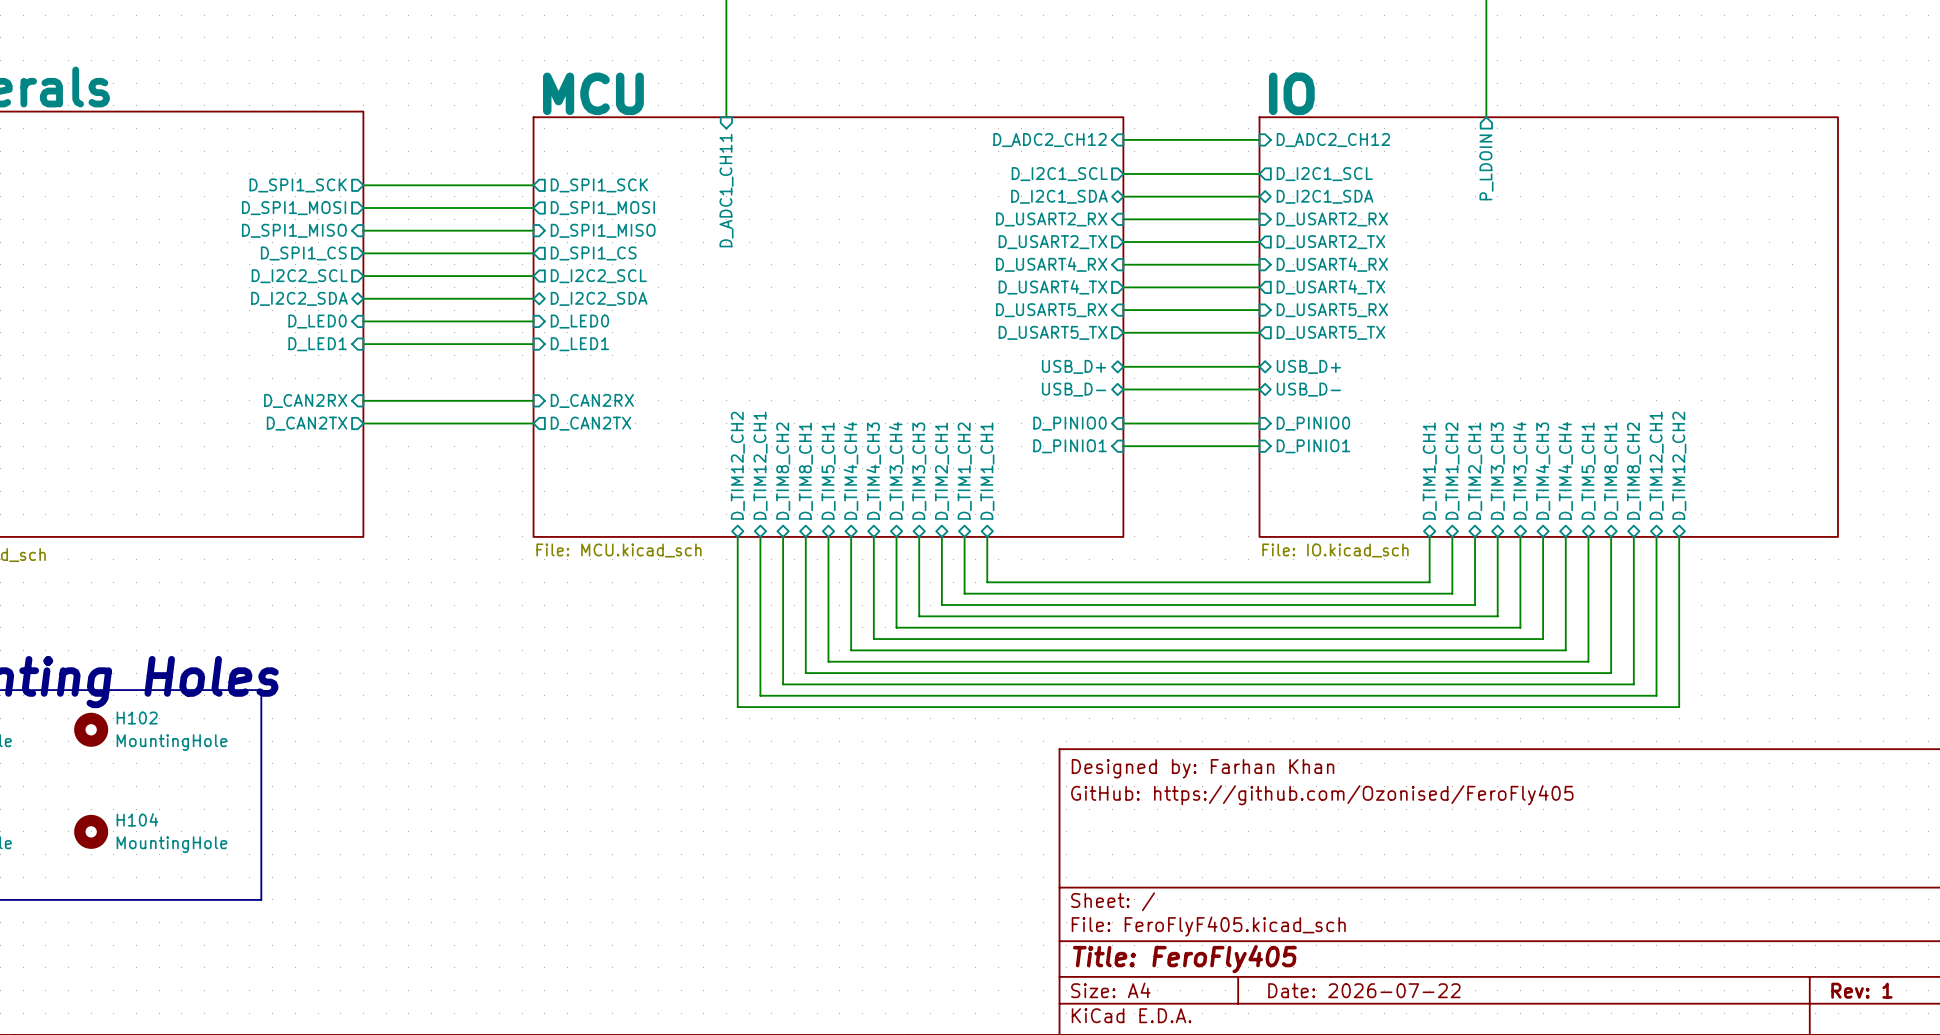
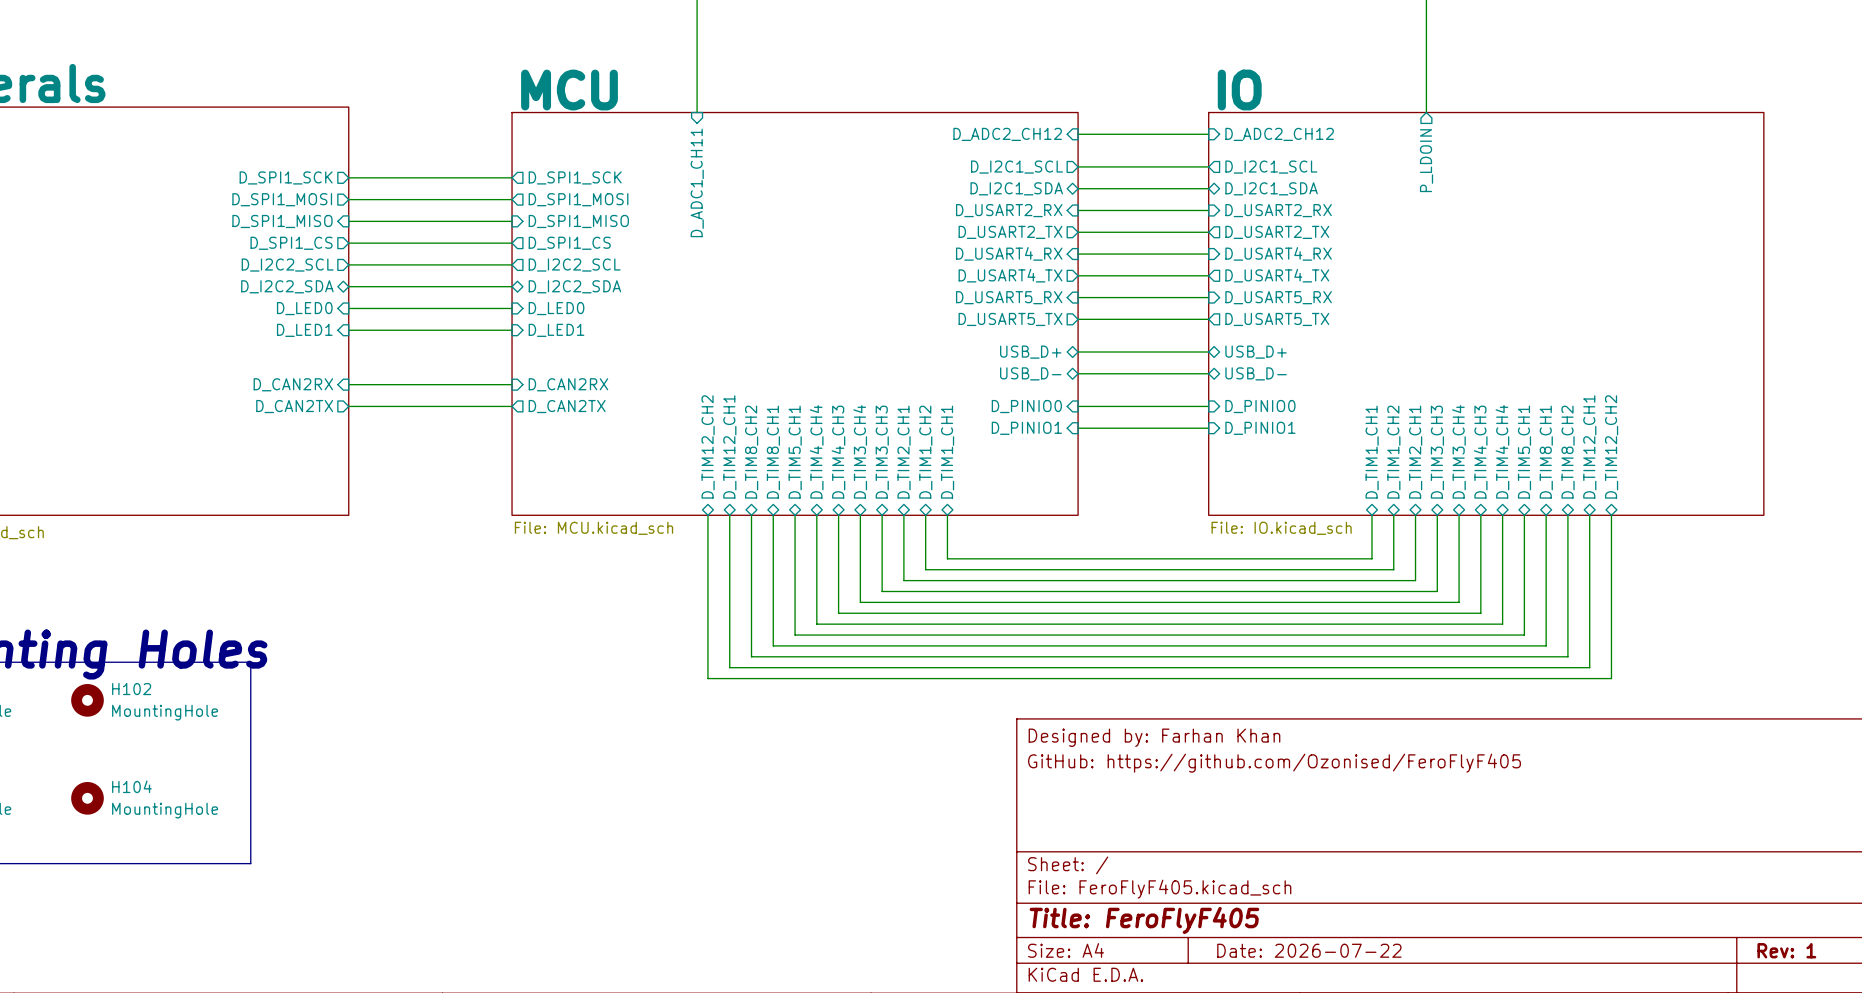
title block: GitHub: https://github.com/Ozonised/FeroFly405 (1322, 795) -> GitHub: https://github.com/Ozonised/FeroFlyF405 (1274, 763)
title block: Title: FeroFly405 (1184, 959) -> Title: FeroFlyF405 (1144, 920)

